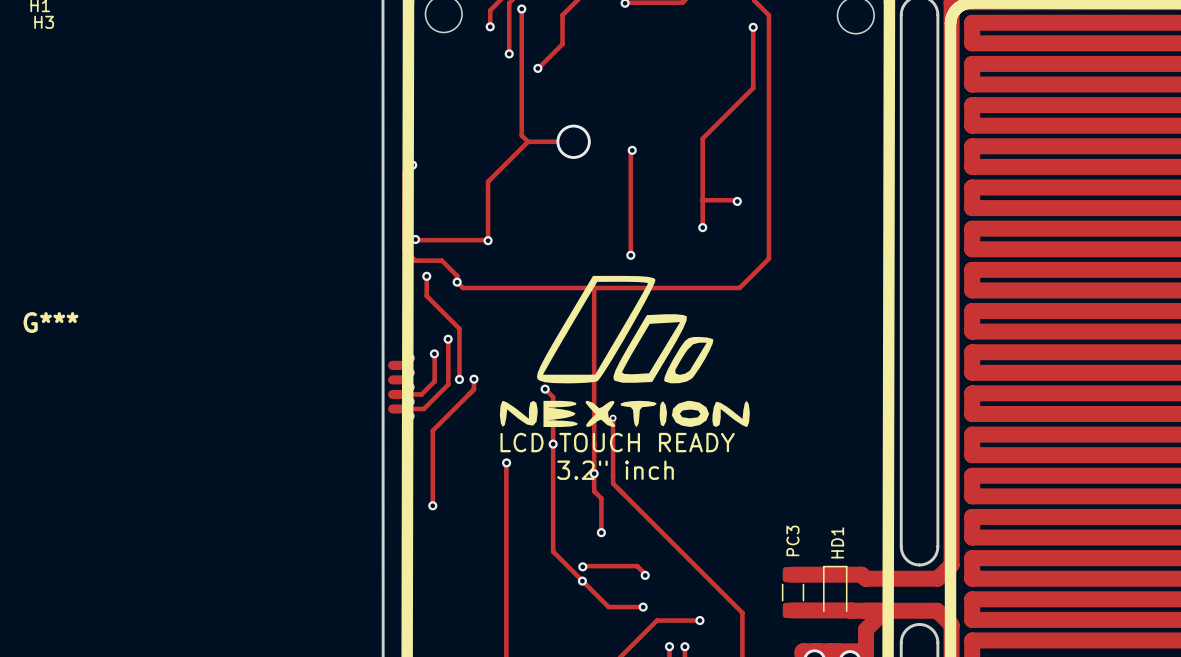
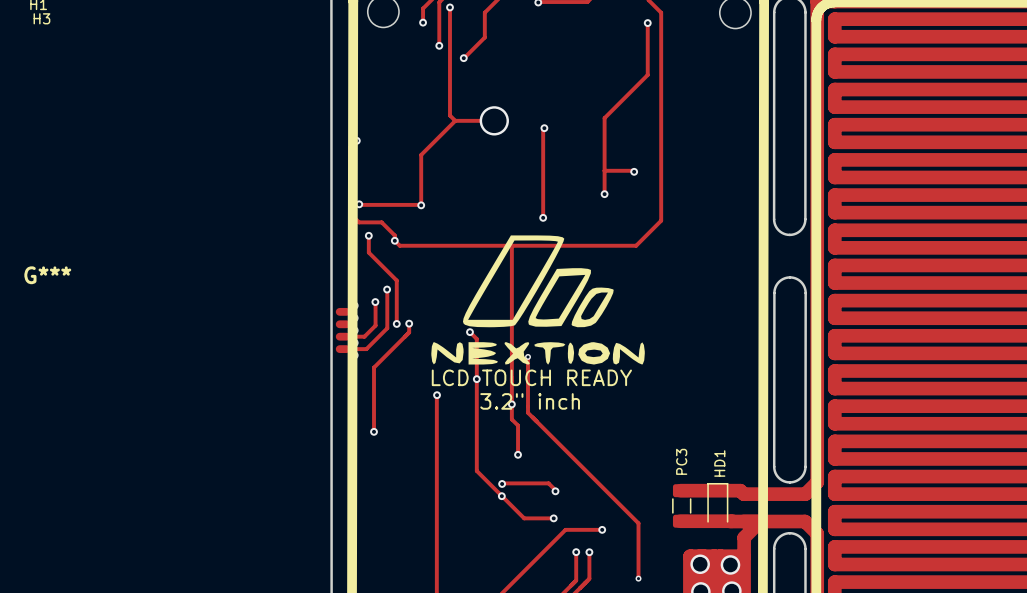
board edge: (901, 14) (901, 546) -> (805, 466) (805, 291) (799, 280) (790, 277) (778, 282) (774, 291) (774, 466)
board edge: (937, 14) (937, 546) -> (805, 12) (805, 221) (799, 231) (789, 234) (780, 231) (774, 221) (774, 12)

